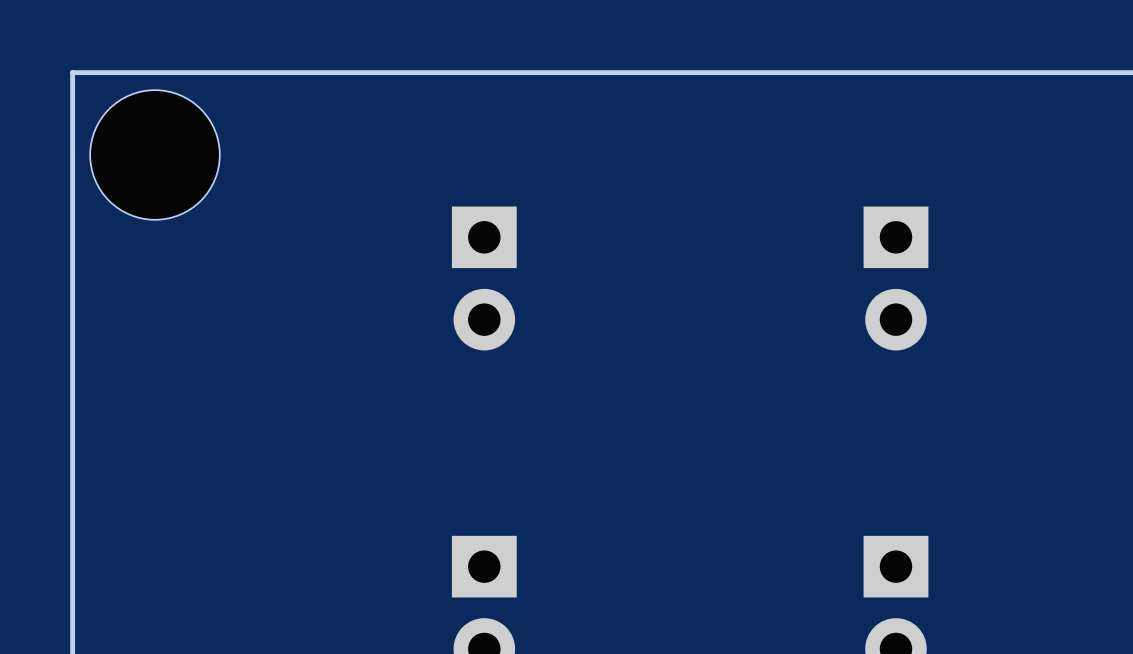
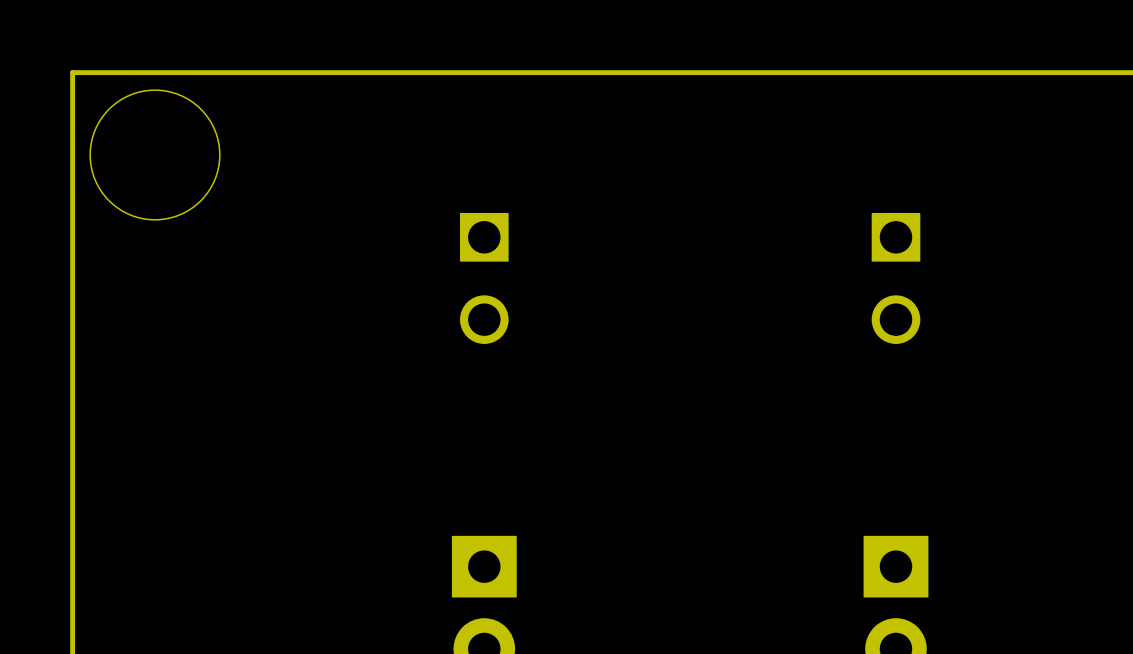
part footprint: [451, 206, 517, 351] -> [460, 213, 509, 344]
part footprint: [863, 206, 929, 351] -> [871, 213, 921, 344]

